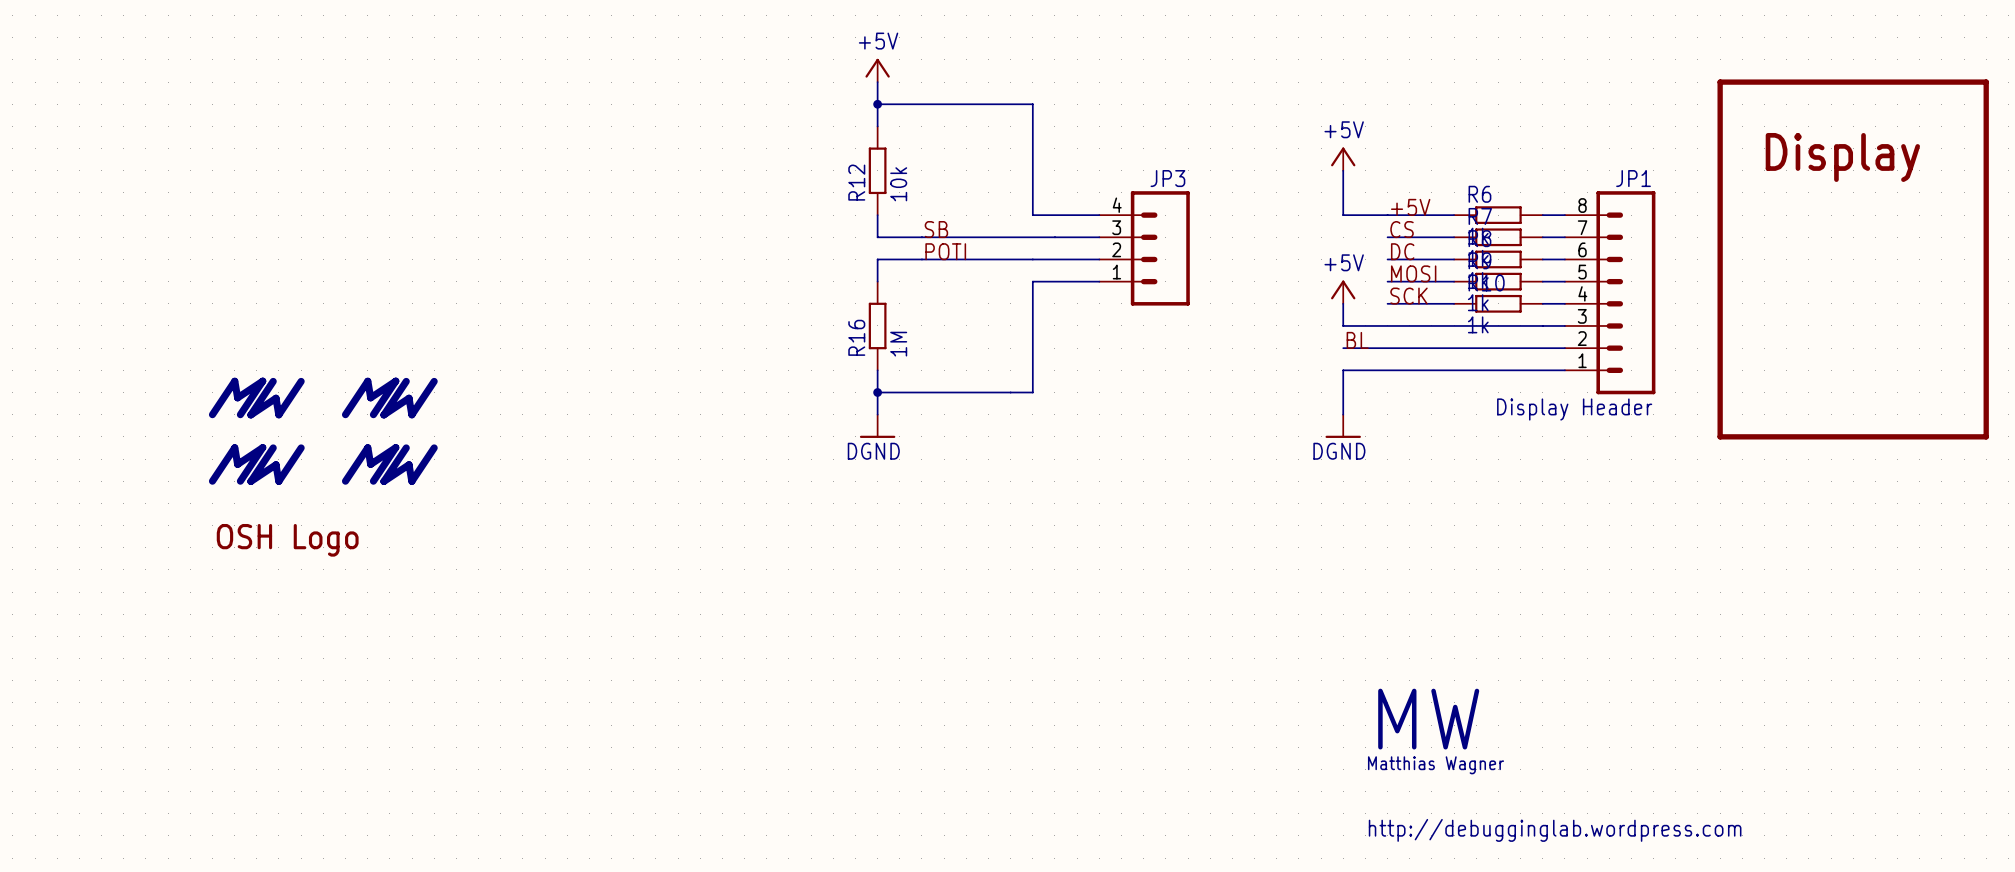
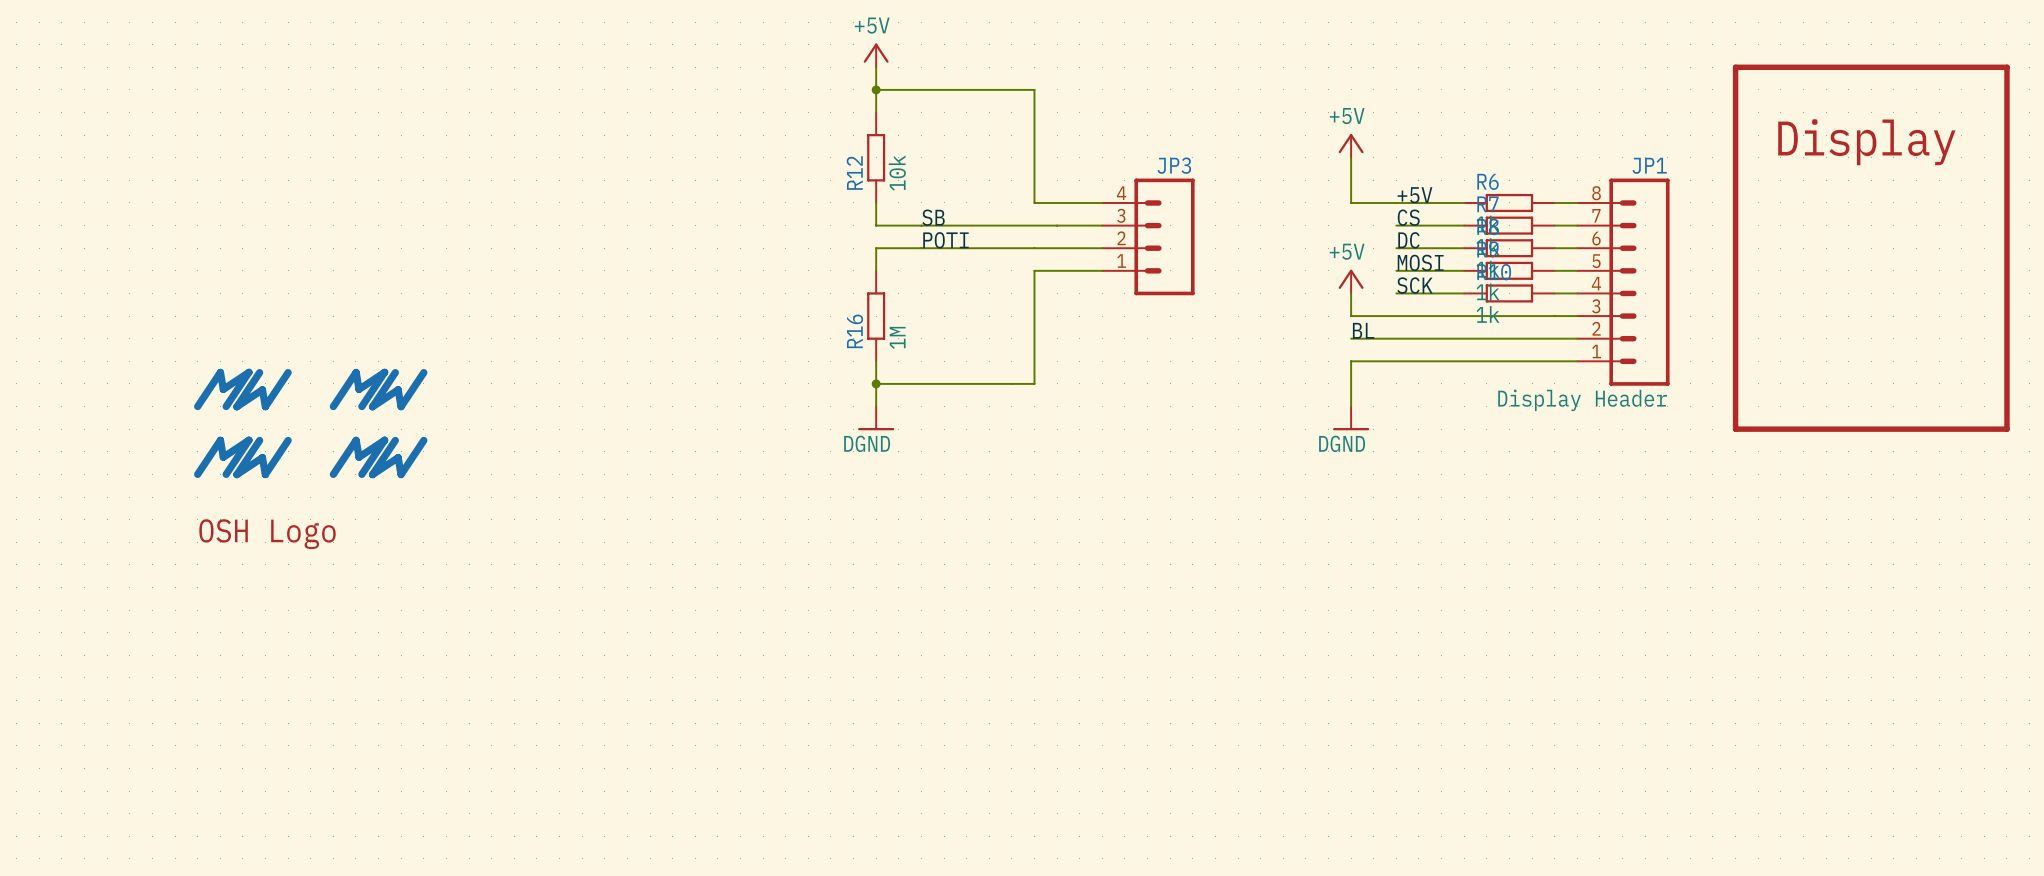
text: MW (1428, 719) -> none
text: Matthias Wagner (1436, 765) -> none
text: http://debugginglab.wordpress.com (1555, 830) -> none

